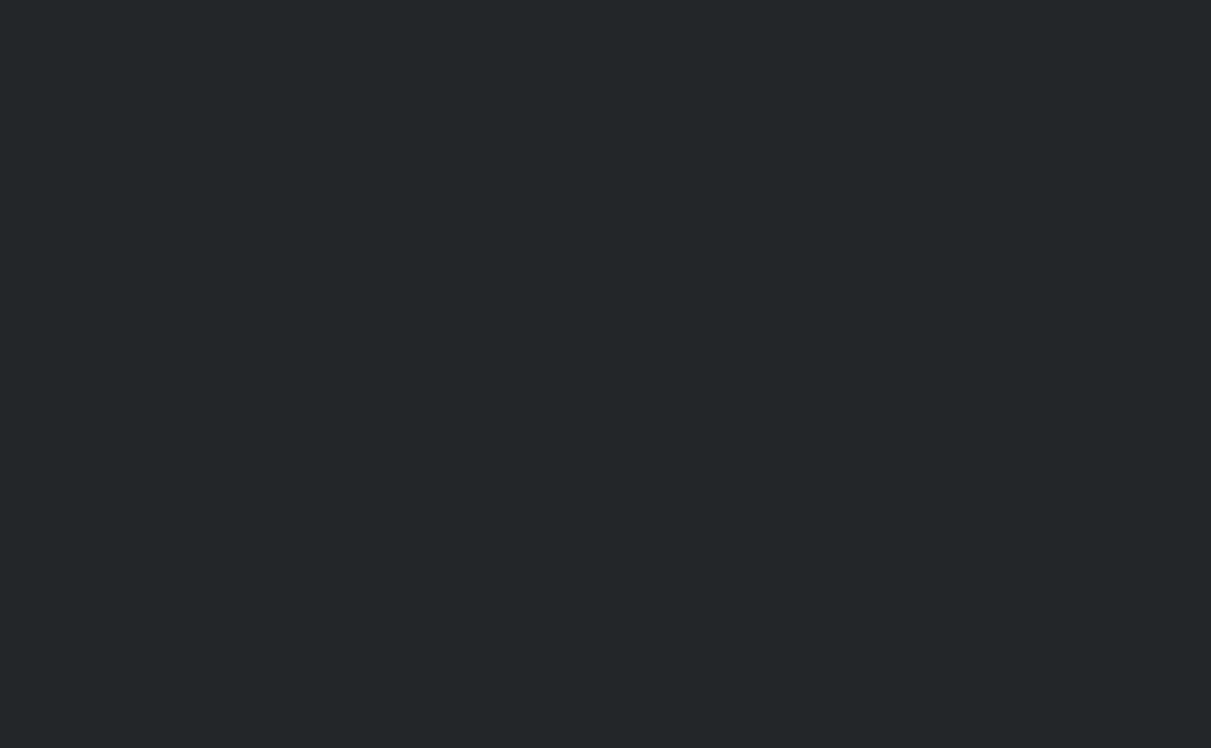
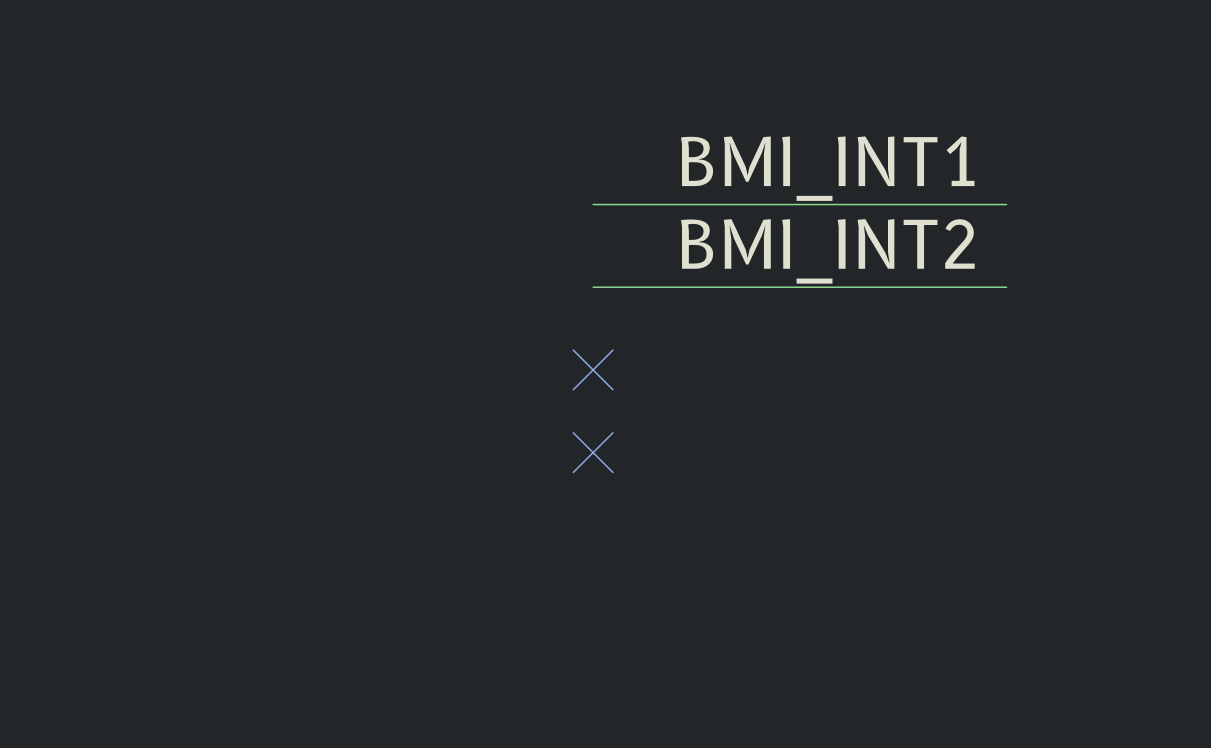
label: none -> BMI_INT1 (827, 168)
wire: none -> (593, 204) (1006, 204)
label: none -> BMI_INT2 (827, 251)
wire: none -> (593, 287) (1006, 287)
no-connect mark: none -> (593, 369)
no-connect mark: none -> (593, 452)

